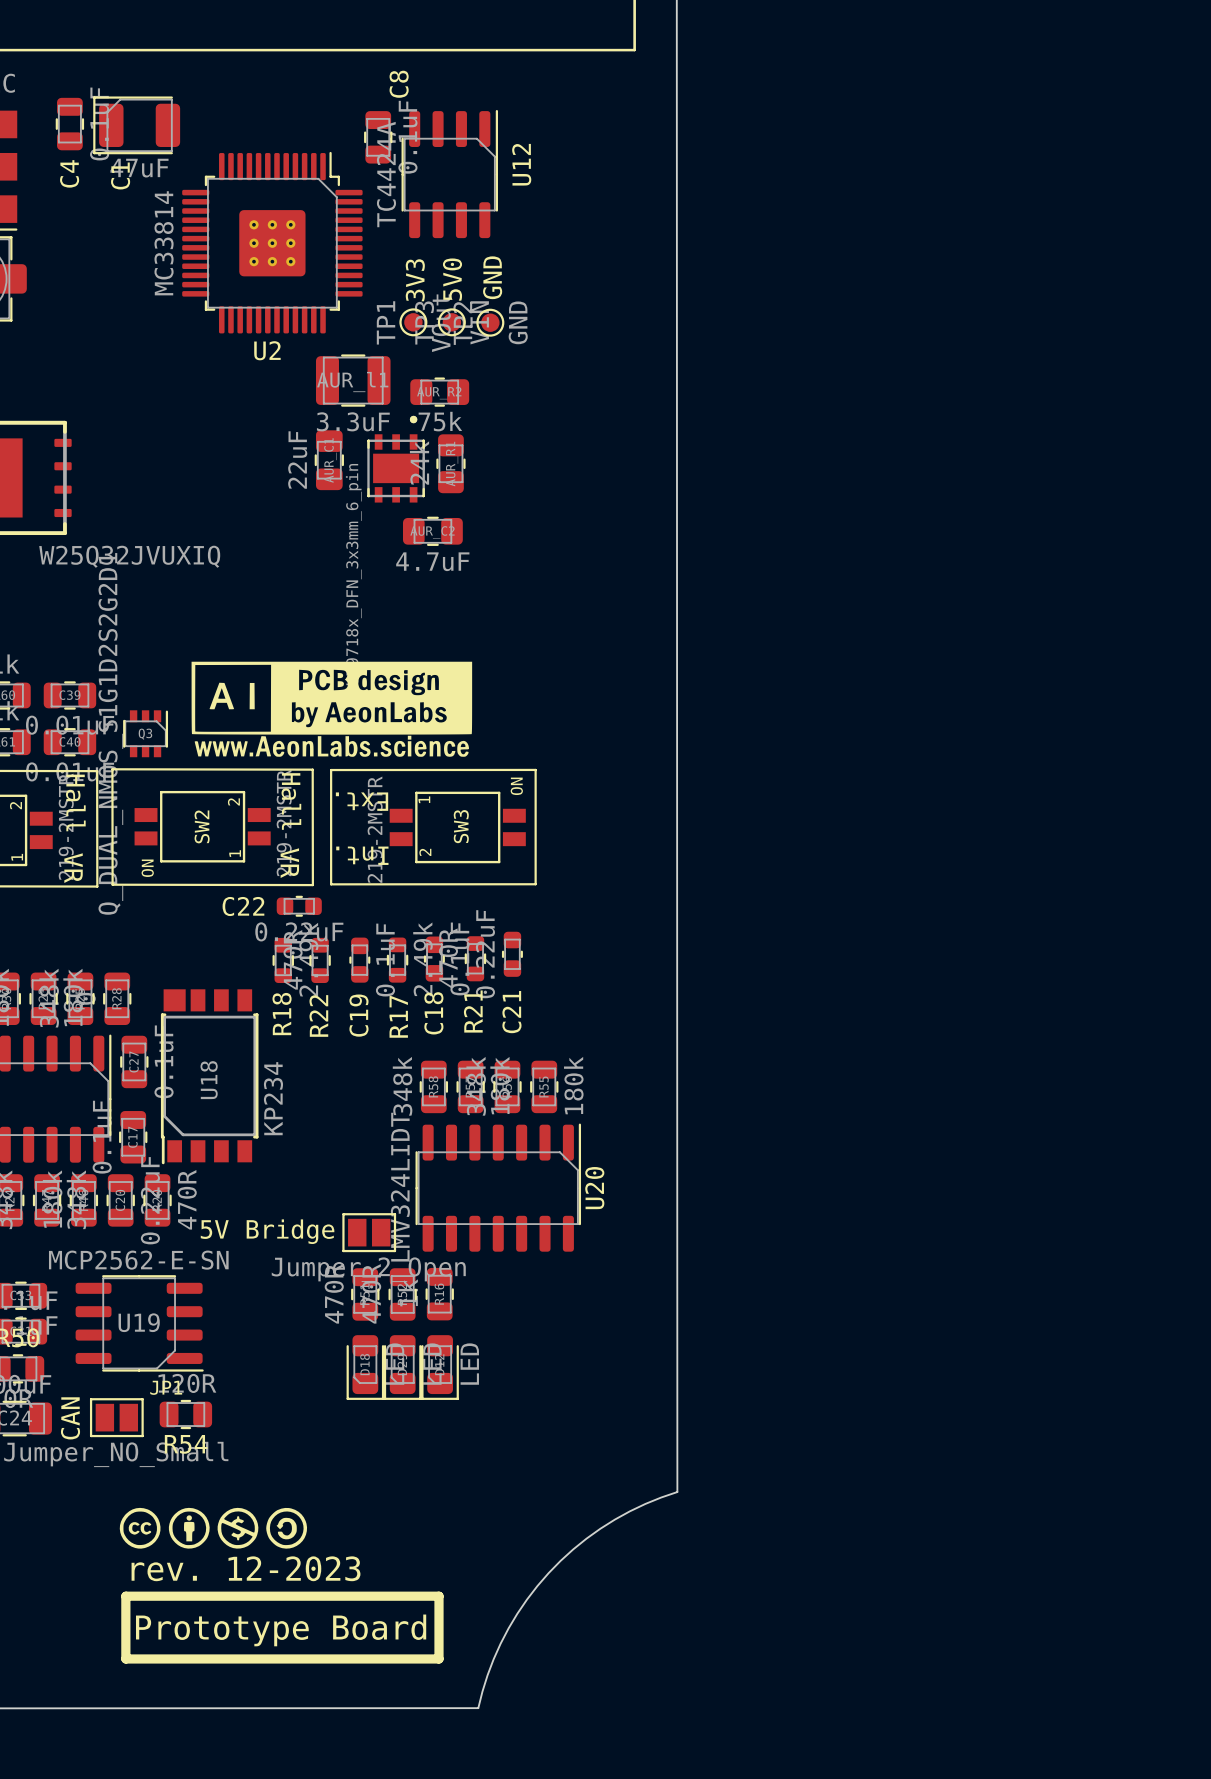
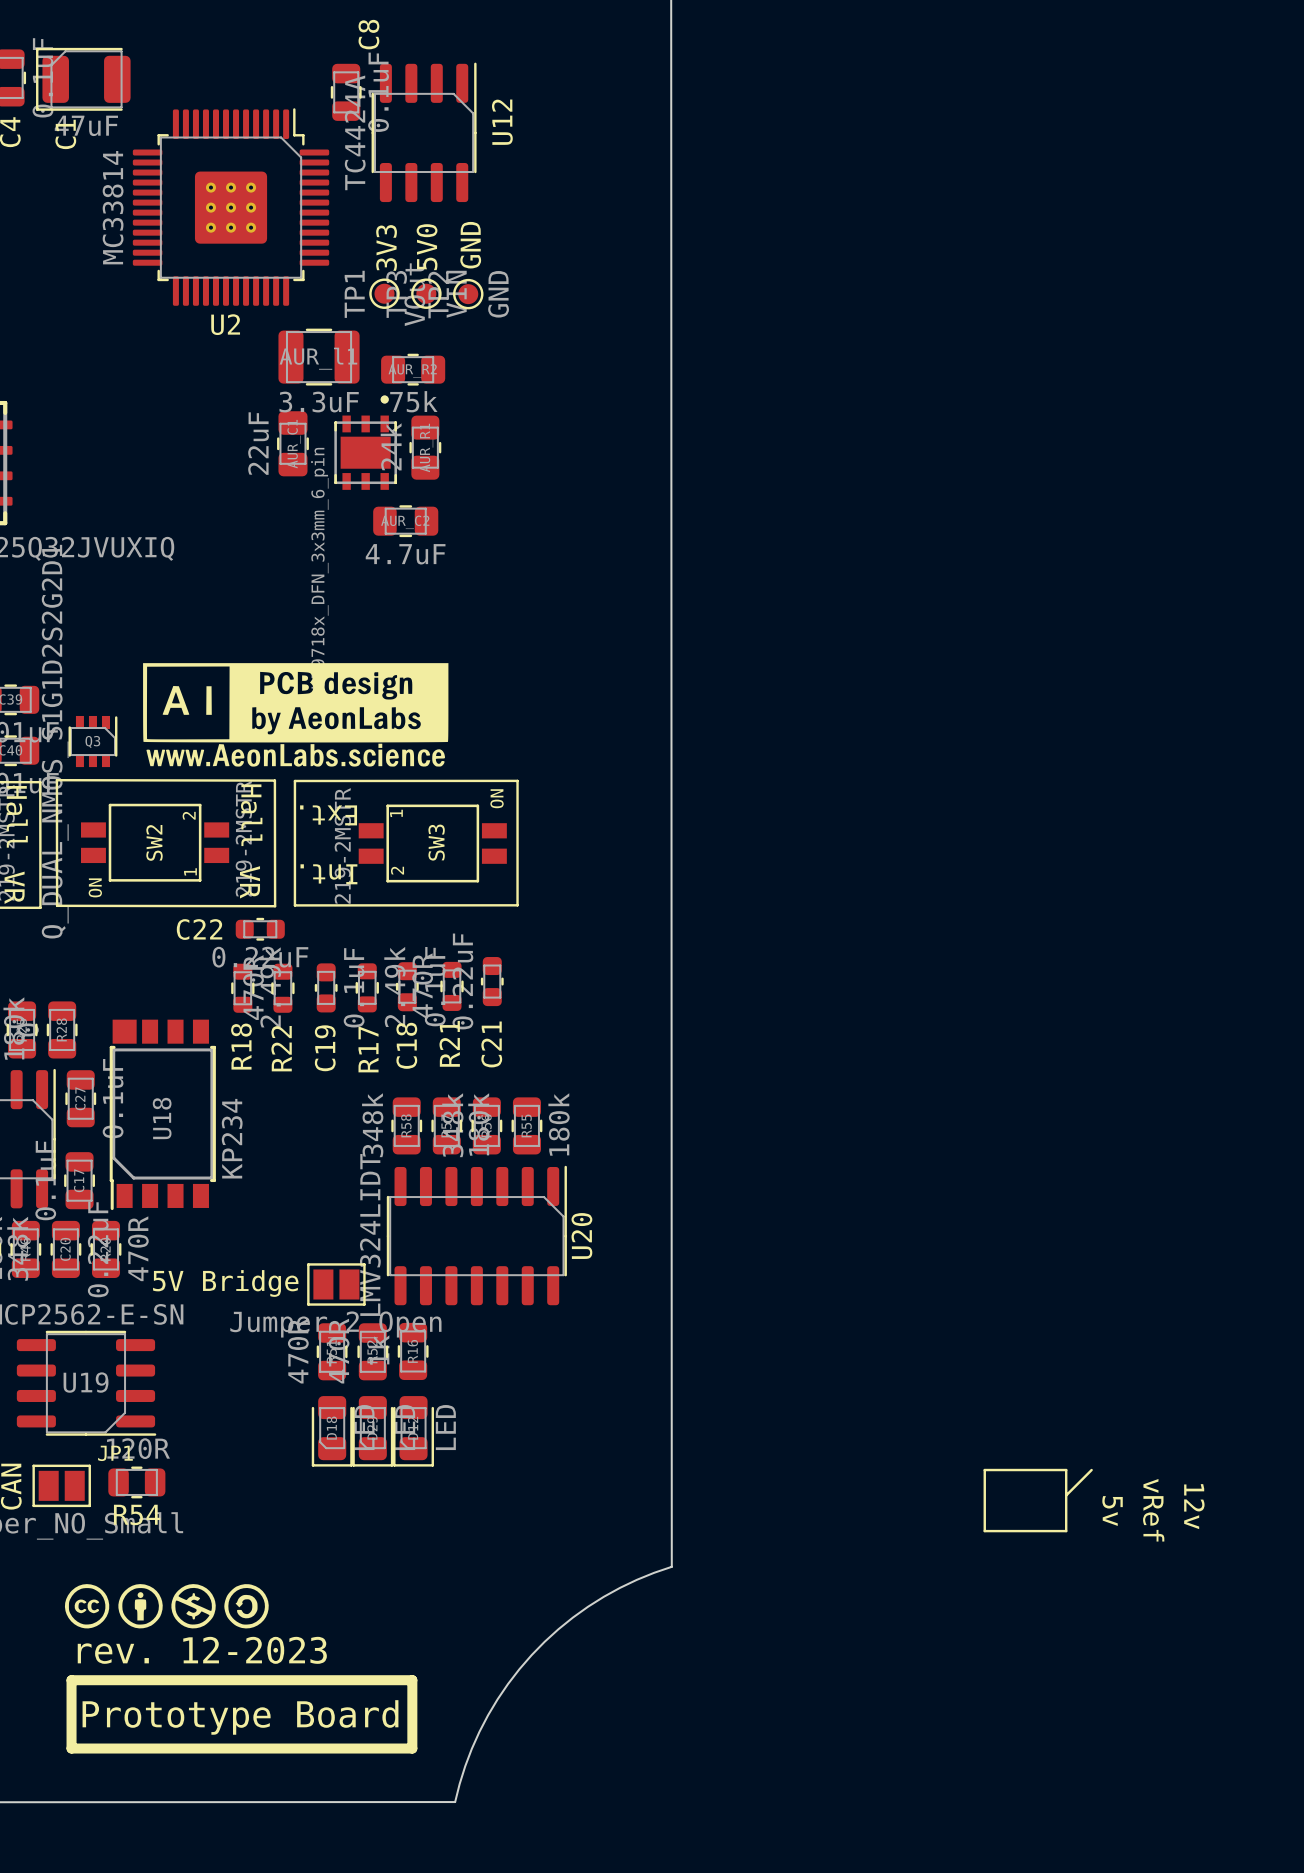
line: none -> (984, 1470) (1066, 1470) (1066, 1531) (984, 1531) (984, 1470)
line: none -> (1091, 1470) (1066, 1495)
text: none -> 12v (1194, 1506)
text: none -> 5v (1112, 1511)
text: none -> vRef (1153, 1510)

